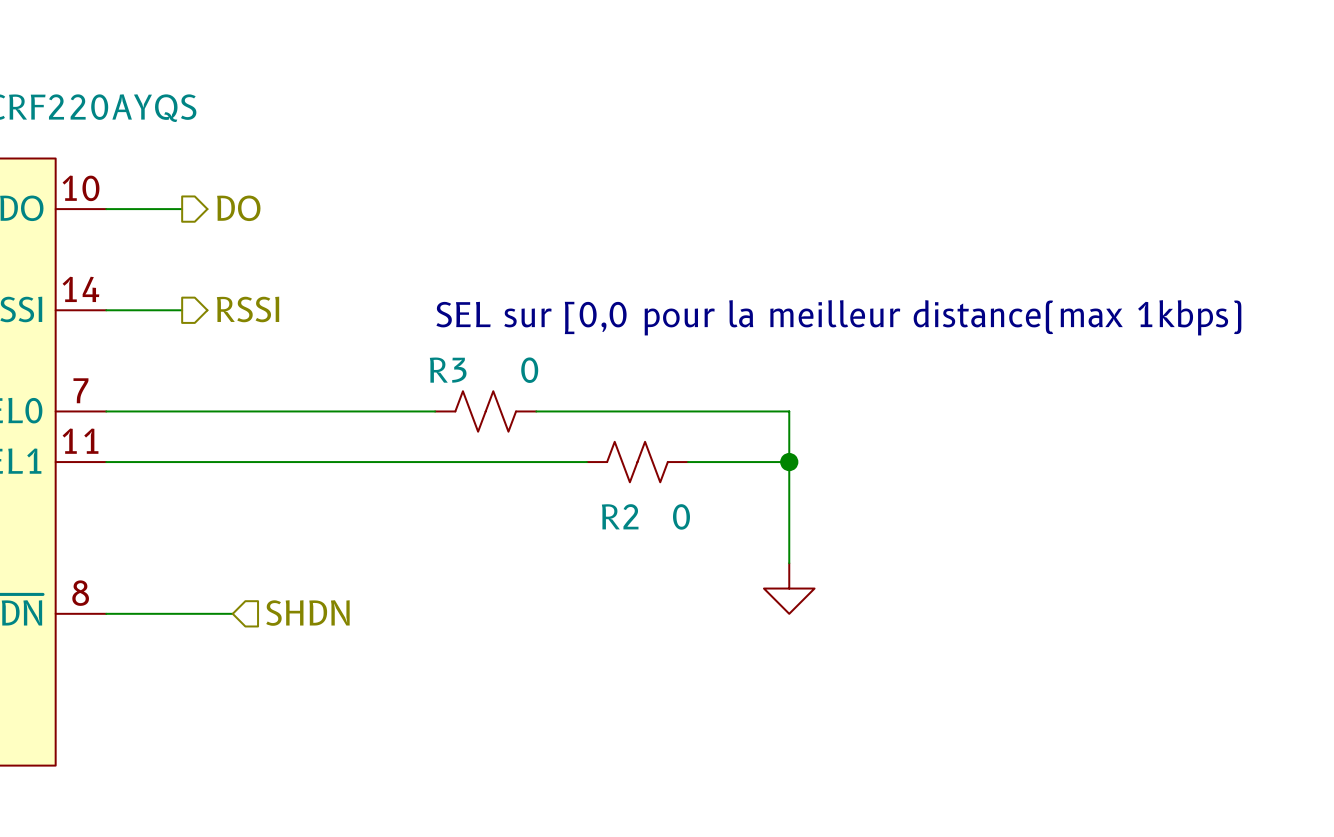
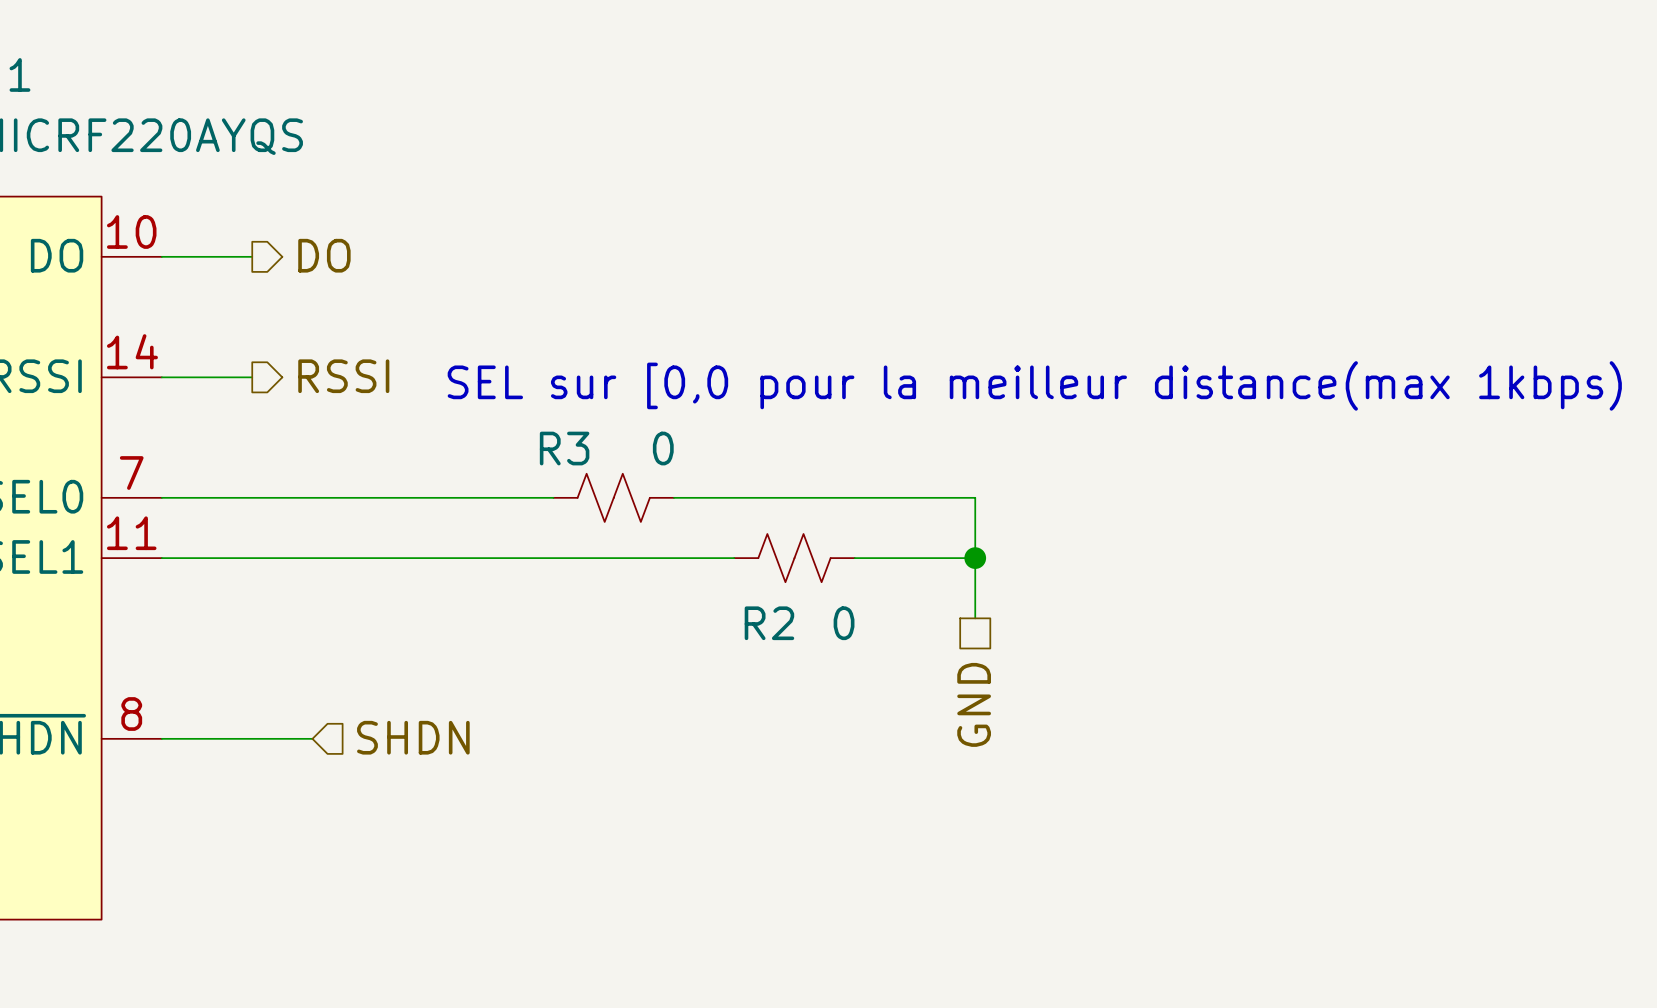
wire: (789, 512) (789, 563) -> none
hierarchical label: none -> GND (974, 704)
power symbol: (789, 588) -> none

